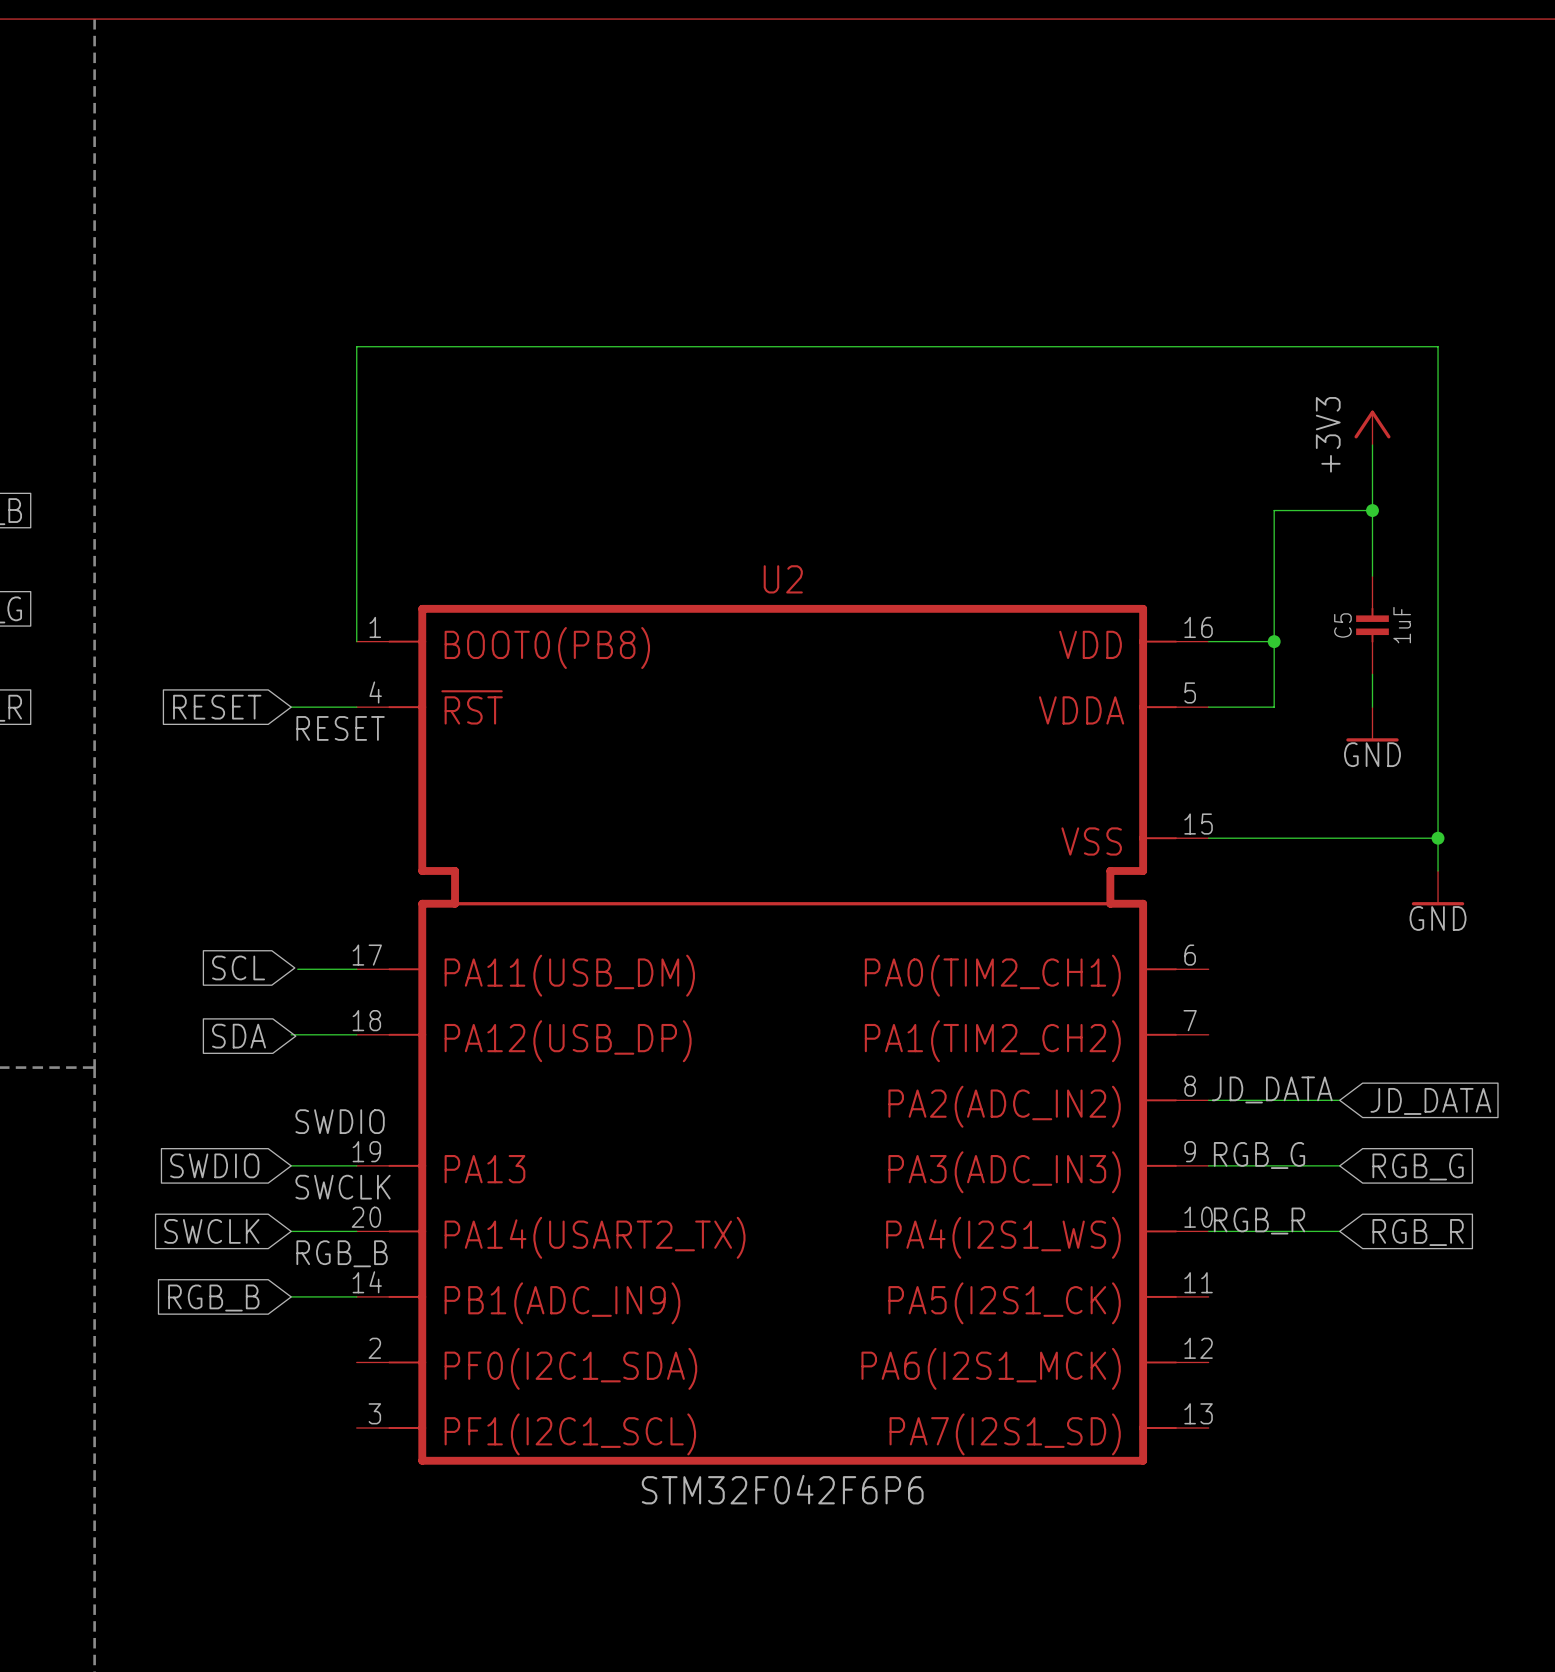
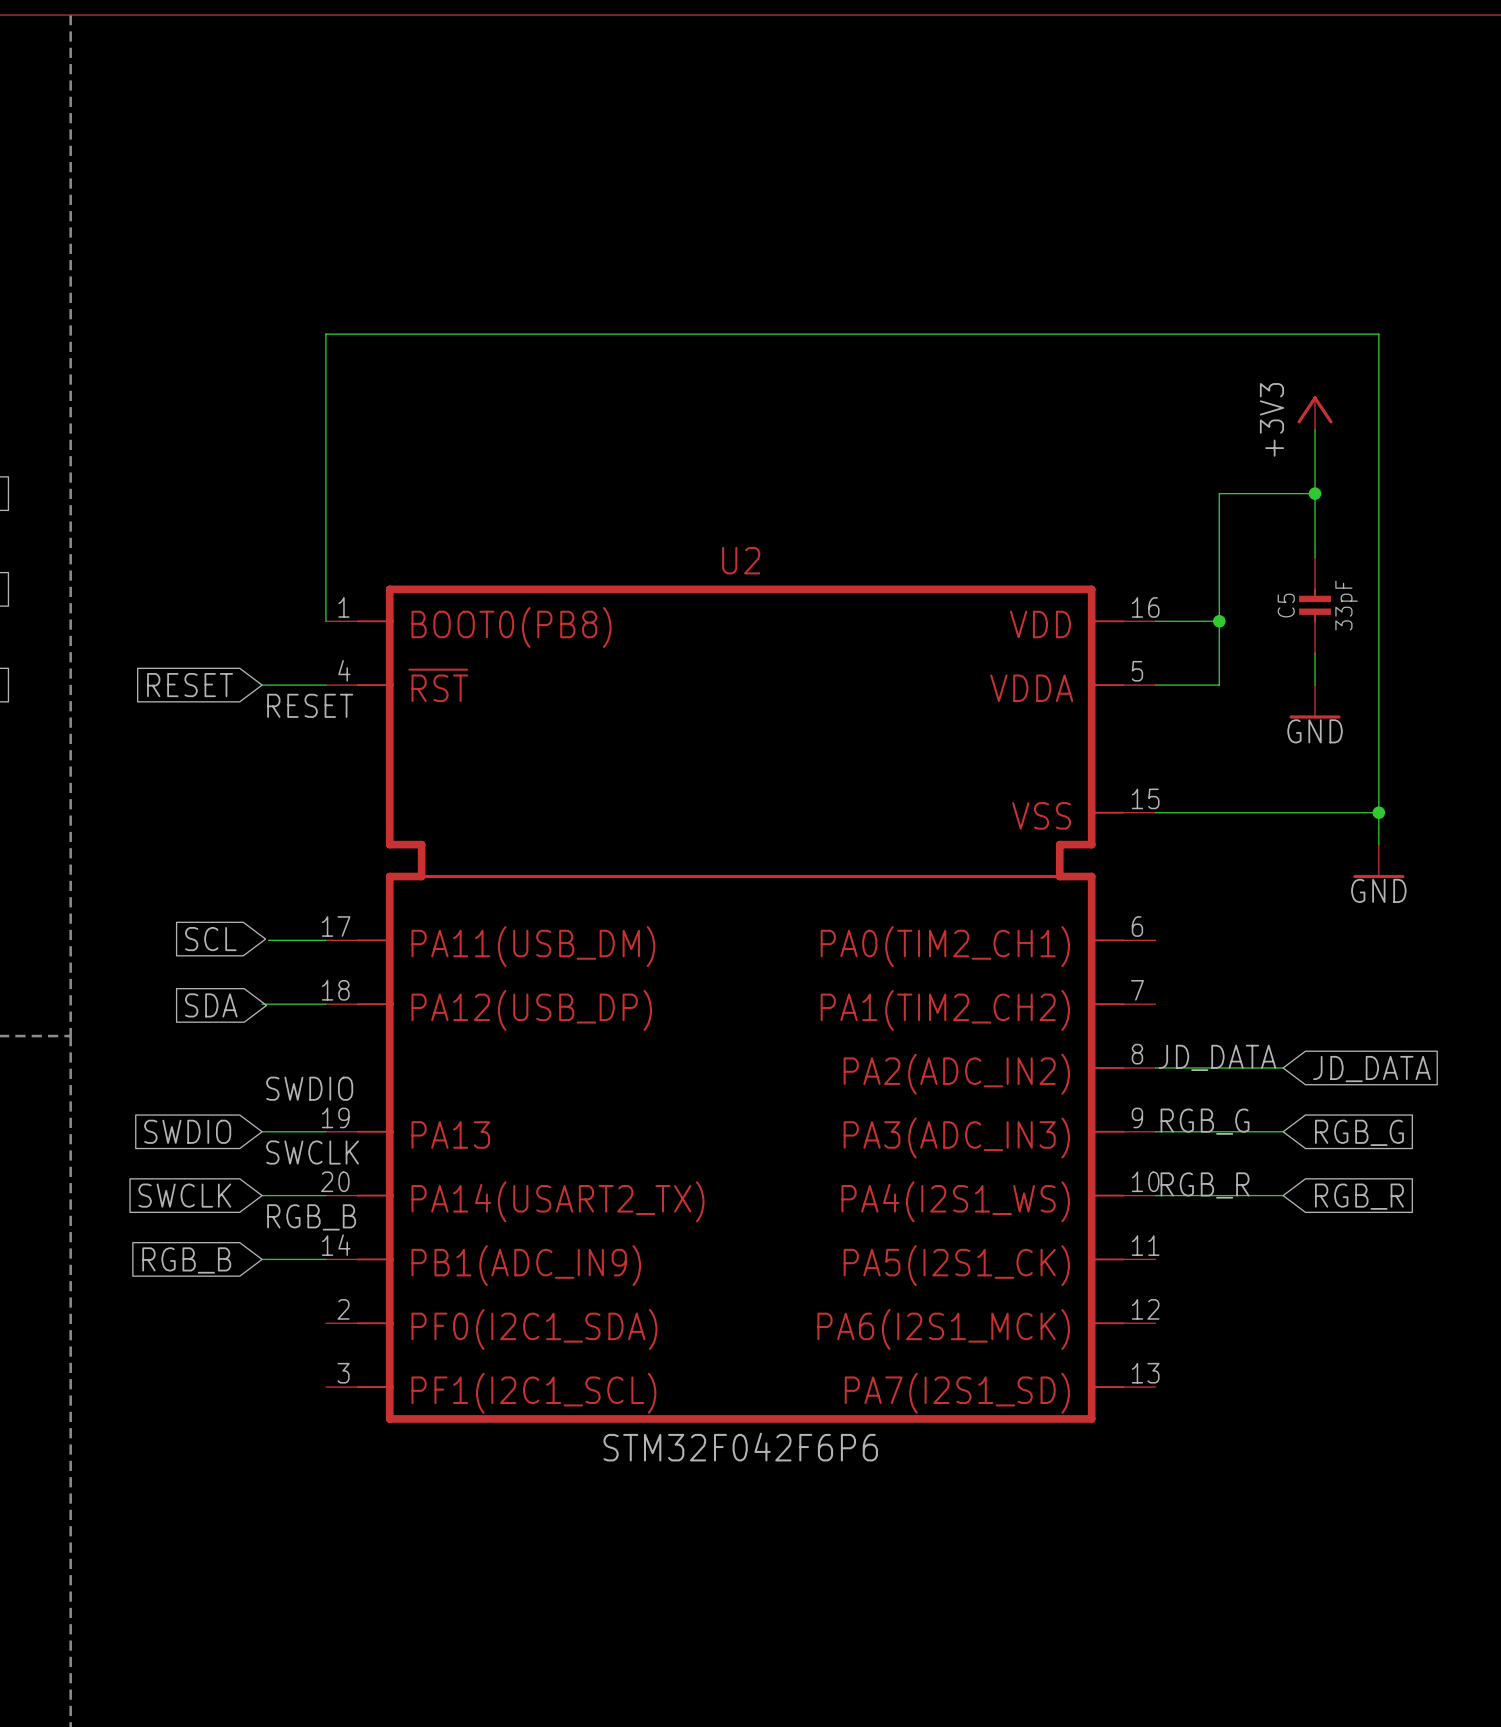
C5 value: 1uF (1402, 625) -> 33pF (1346, 605)

